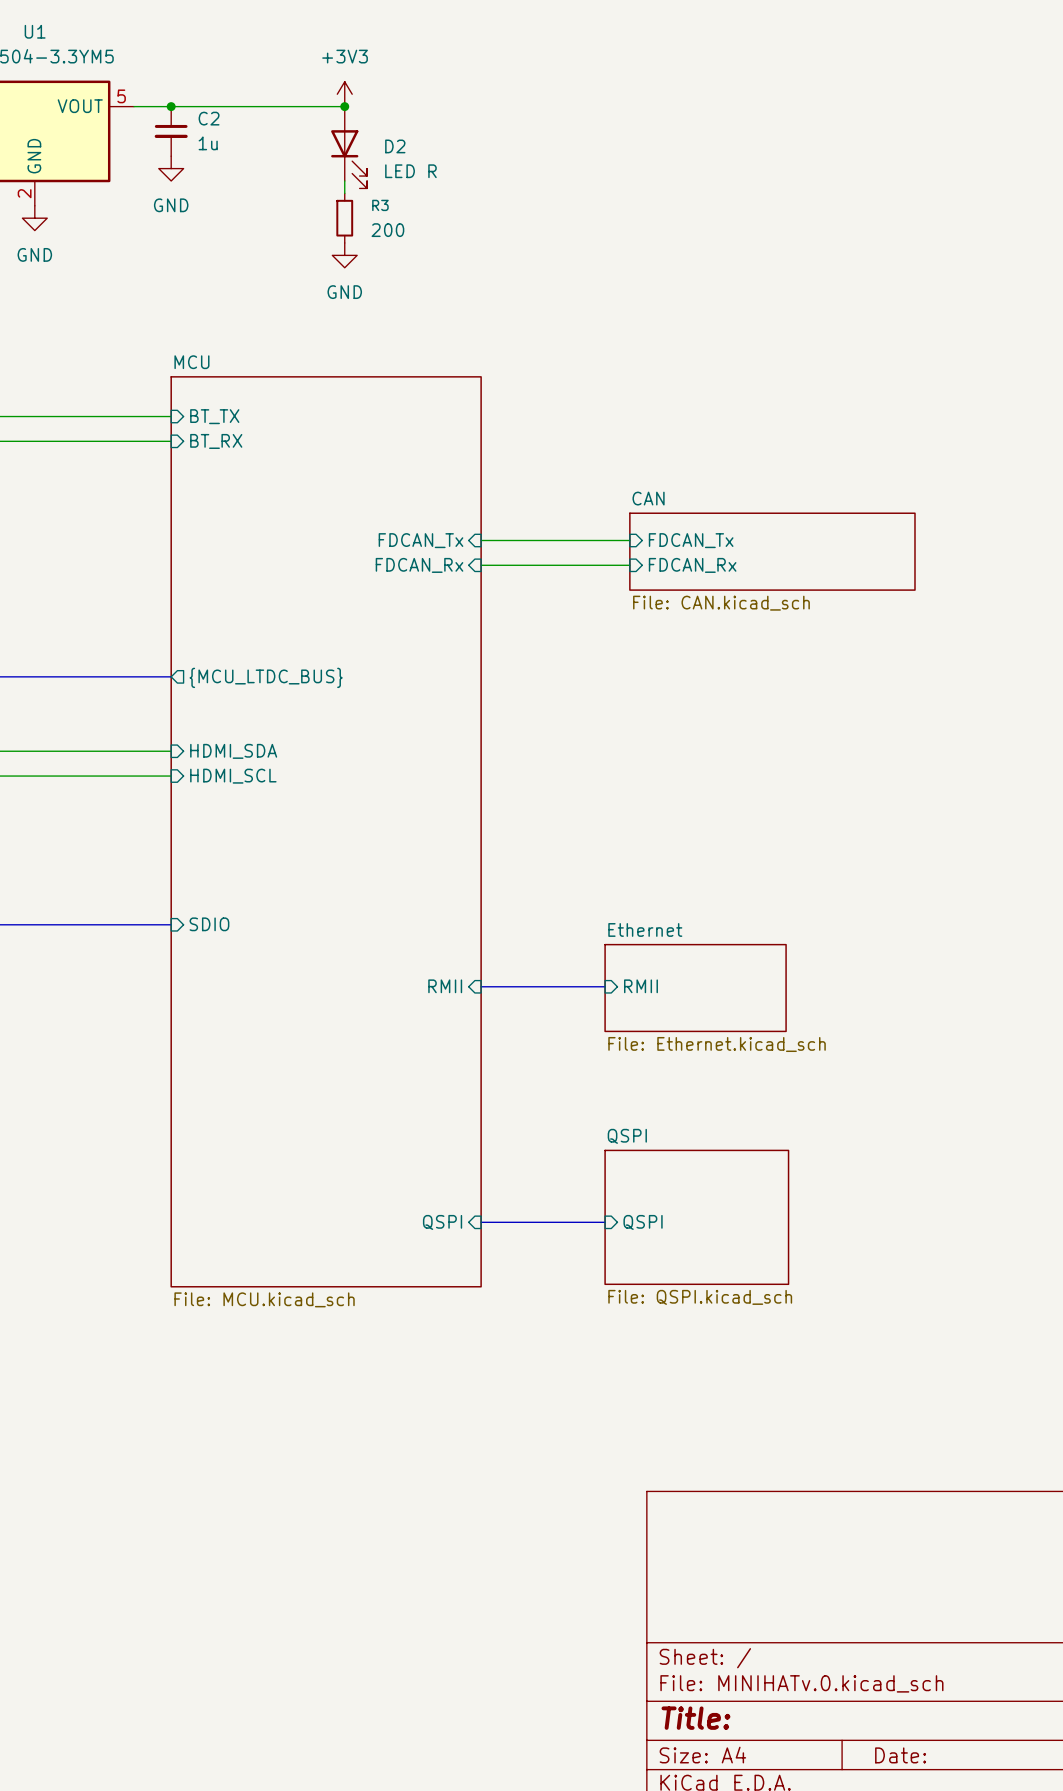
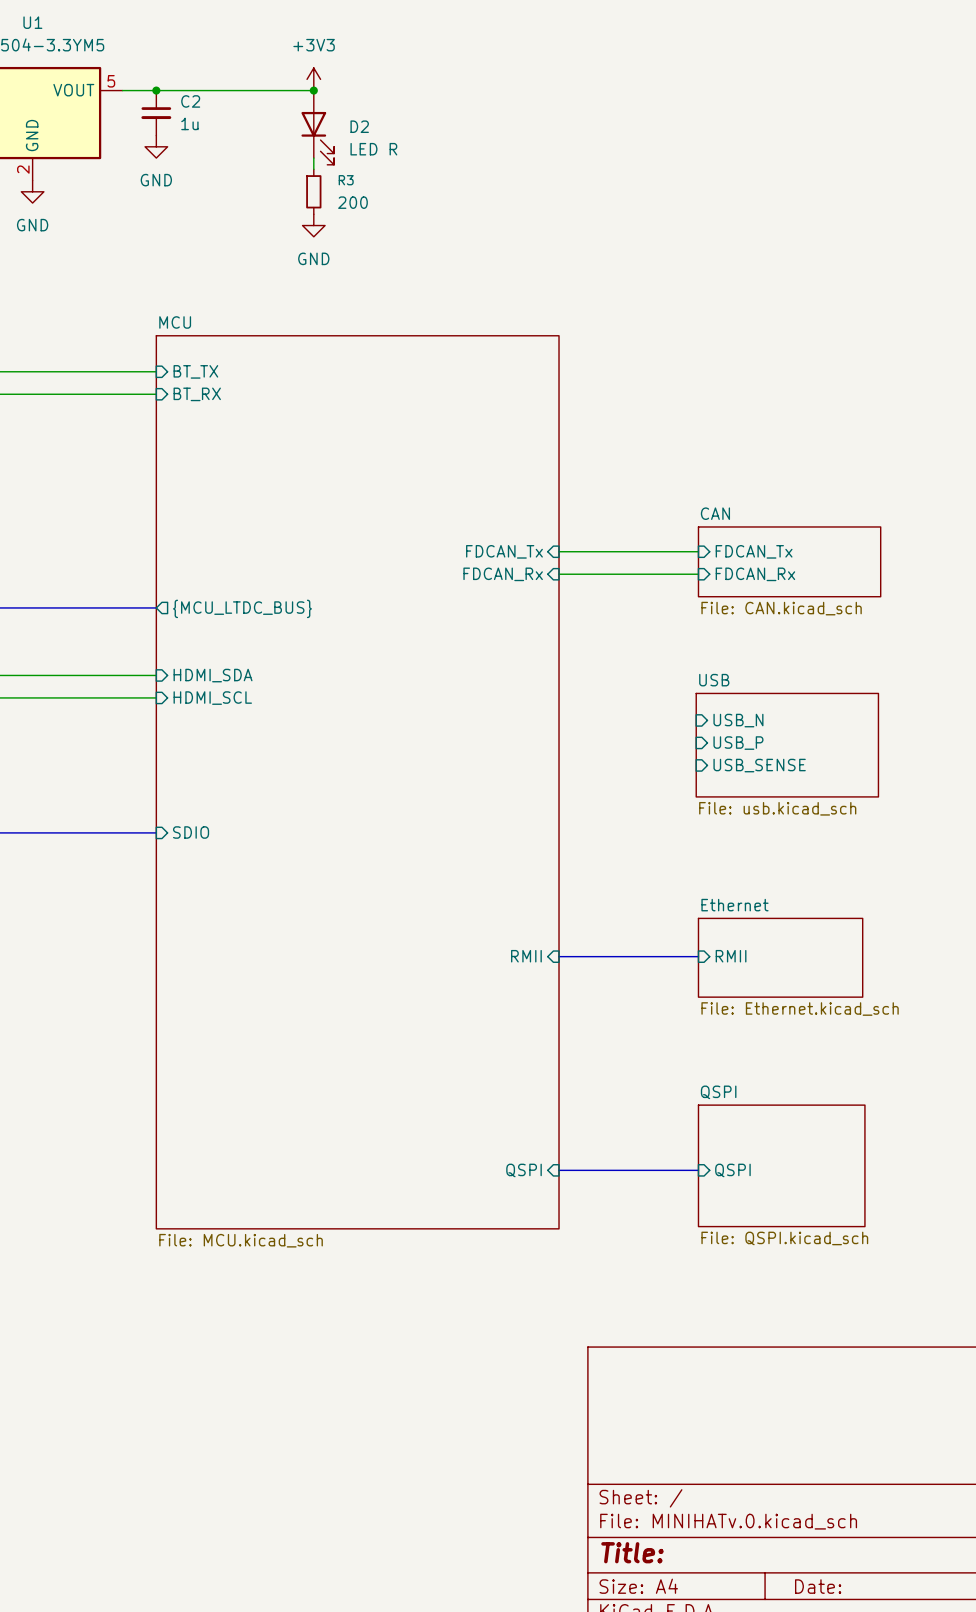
sheet pin: FDCAN_Tx (421, 540) -> none
wire: (481, 540) (629, 540) -> none
sheet pin: FDCAN_Tx (691, 540) -> none
sheet CAN: File: CAN.kicad_sch (772, 551) -> none
sheet pin: FDCAN_Rx (419, 565) -> none
wire: (481, 565) (629, 565) -> none
sheet pin: FDCAN_Rx (692, 565) -> none
wire: none -> (559, 551) (698, 551)
sheet pin: none -> FDCAN_Tx (504, 551)
sheet pin: none -> FDCAN_Tx (754, 551)
sheet CAN: none -> File: CAN.kicad_sch (789, 561)
sheet pin: none -> FDCAN_Rx (503, 574)
wire: none -> (559, 574) (698, 574)
sheet pin: none -> FDCAN_Rx (755, 574)
sheet pin: none -> USB_N (738, 720)
sheet pin: none -> USB_P (738, 743)
sheet USB: none -> File: usb.kicad_sch (787, 745)
sheet MCU: File: MCU.kicad_sch (326, 831) -> none
sheet pin: none -> USB_SENSE (759, 765)
sheet MCU: none -> File: MCU.kicad_sch (357, 782)
sheet pin: RMII (445, 986) -> none
bus: (481, 986) (605, 986) -> none
sheet pin: RMII (640, 986) -> none
sheet Ethernet position: (695, 988) -> (780, 957)
sheet pin: none -> RMII (526, 956)
sheet pin: none -> RMII (731, 956)
bus: none -> (559, 956) (698, 956)
sheet QSPI position: (696, 1217) -> (781, 1165)
sheet pin: QSPI (442, 1222) -> none
bus: (481, 1222) (605, 1222) -> none
sheet pin: QSPI (643, 1222) -> none
sheet pin: none -> QSPI (524, 1170)
bus: none -> (559, 1170) (698, 1170)
sheet pin: none -> QSPI (732, 1170)

